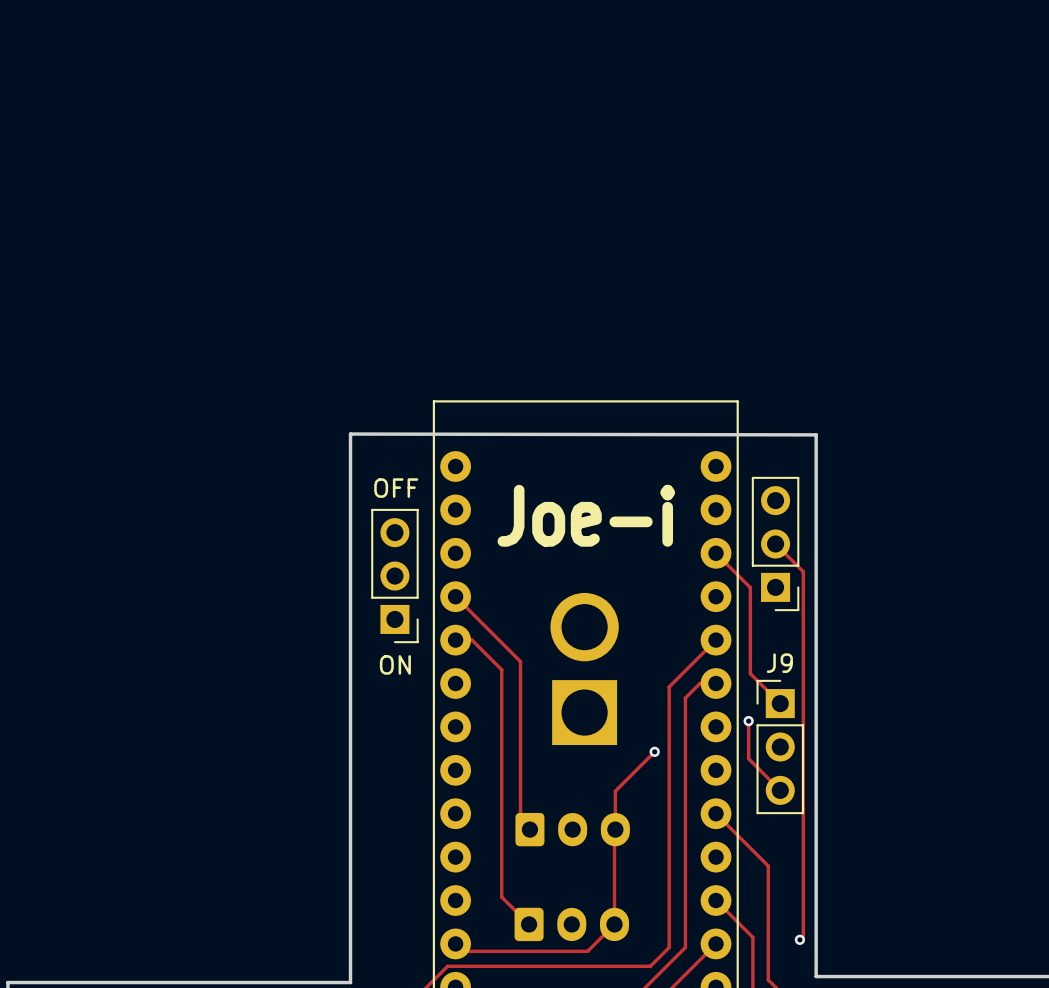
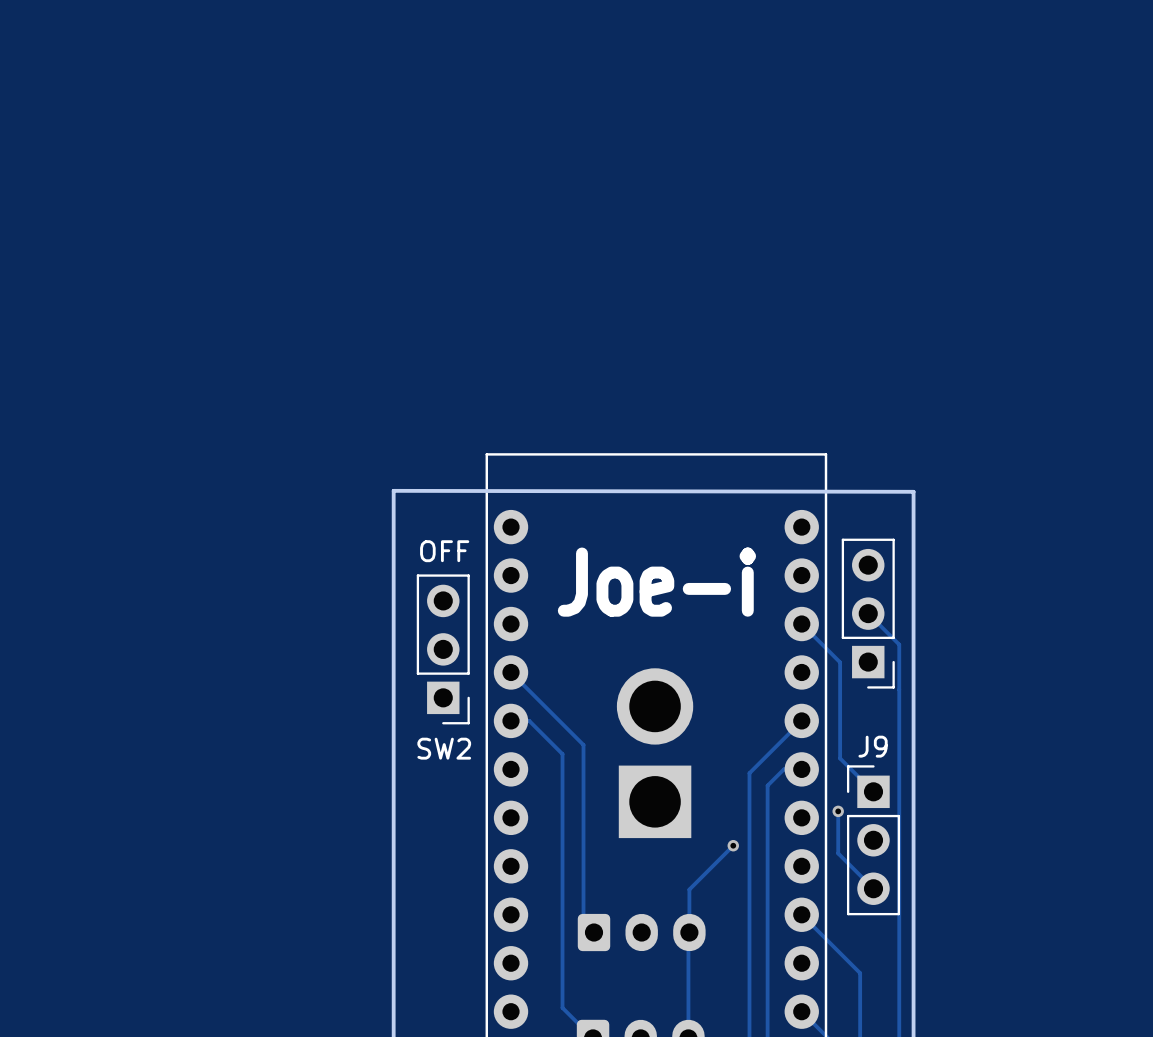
ON name: ON (395, 664) -> SW2 (444, 748)

